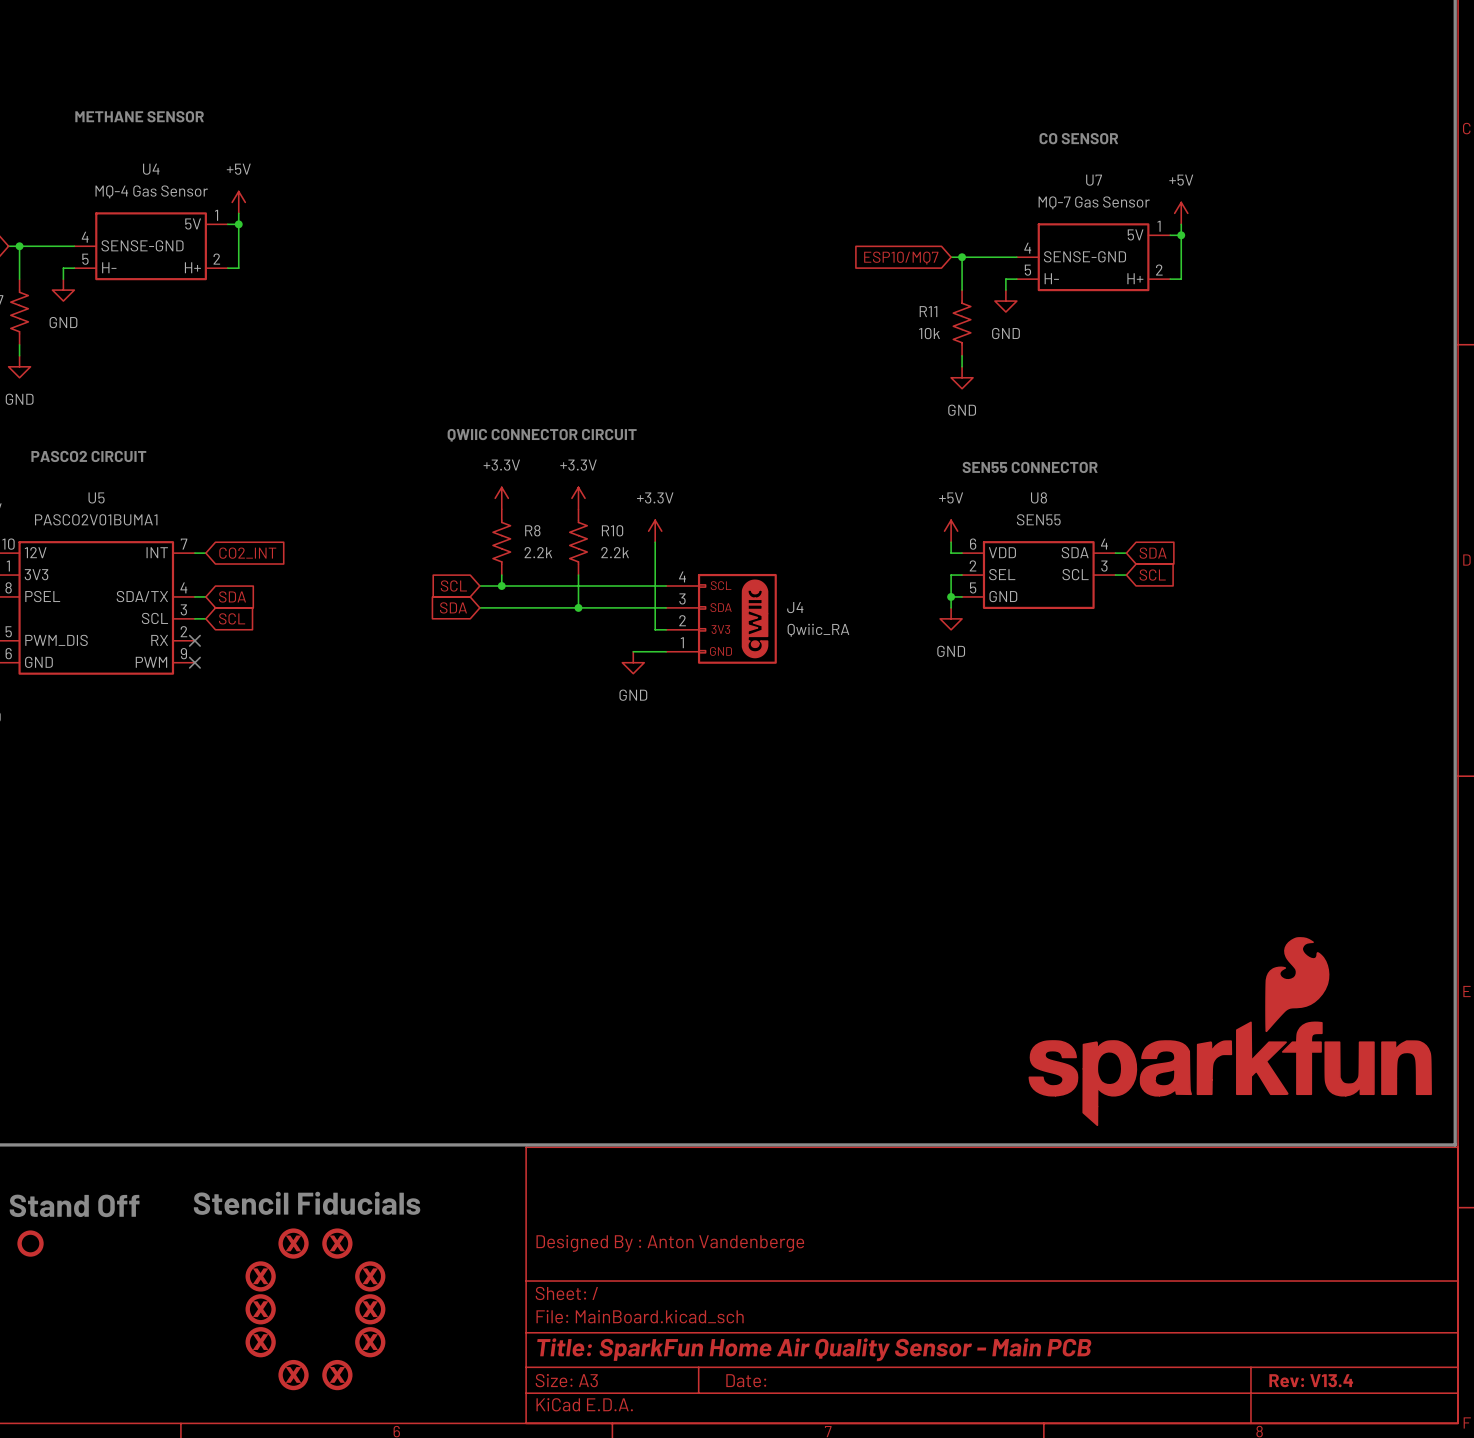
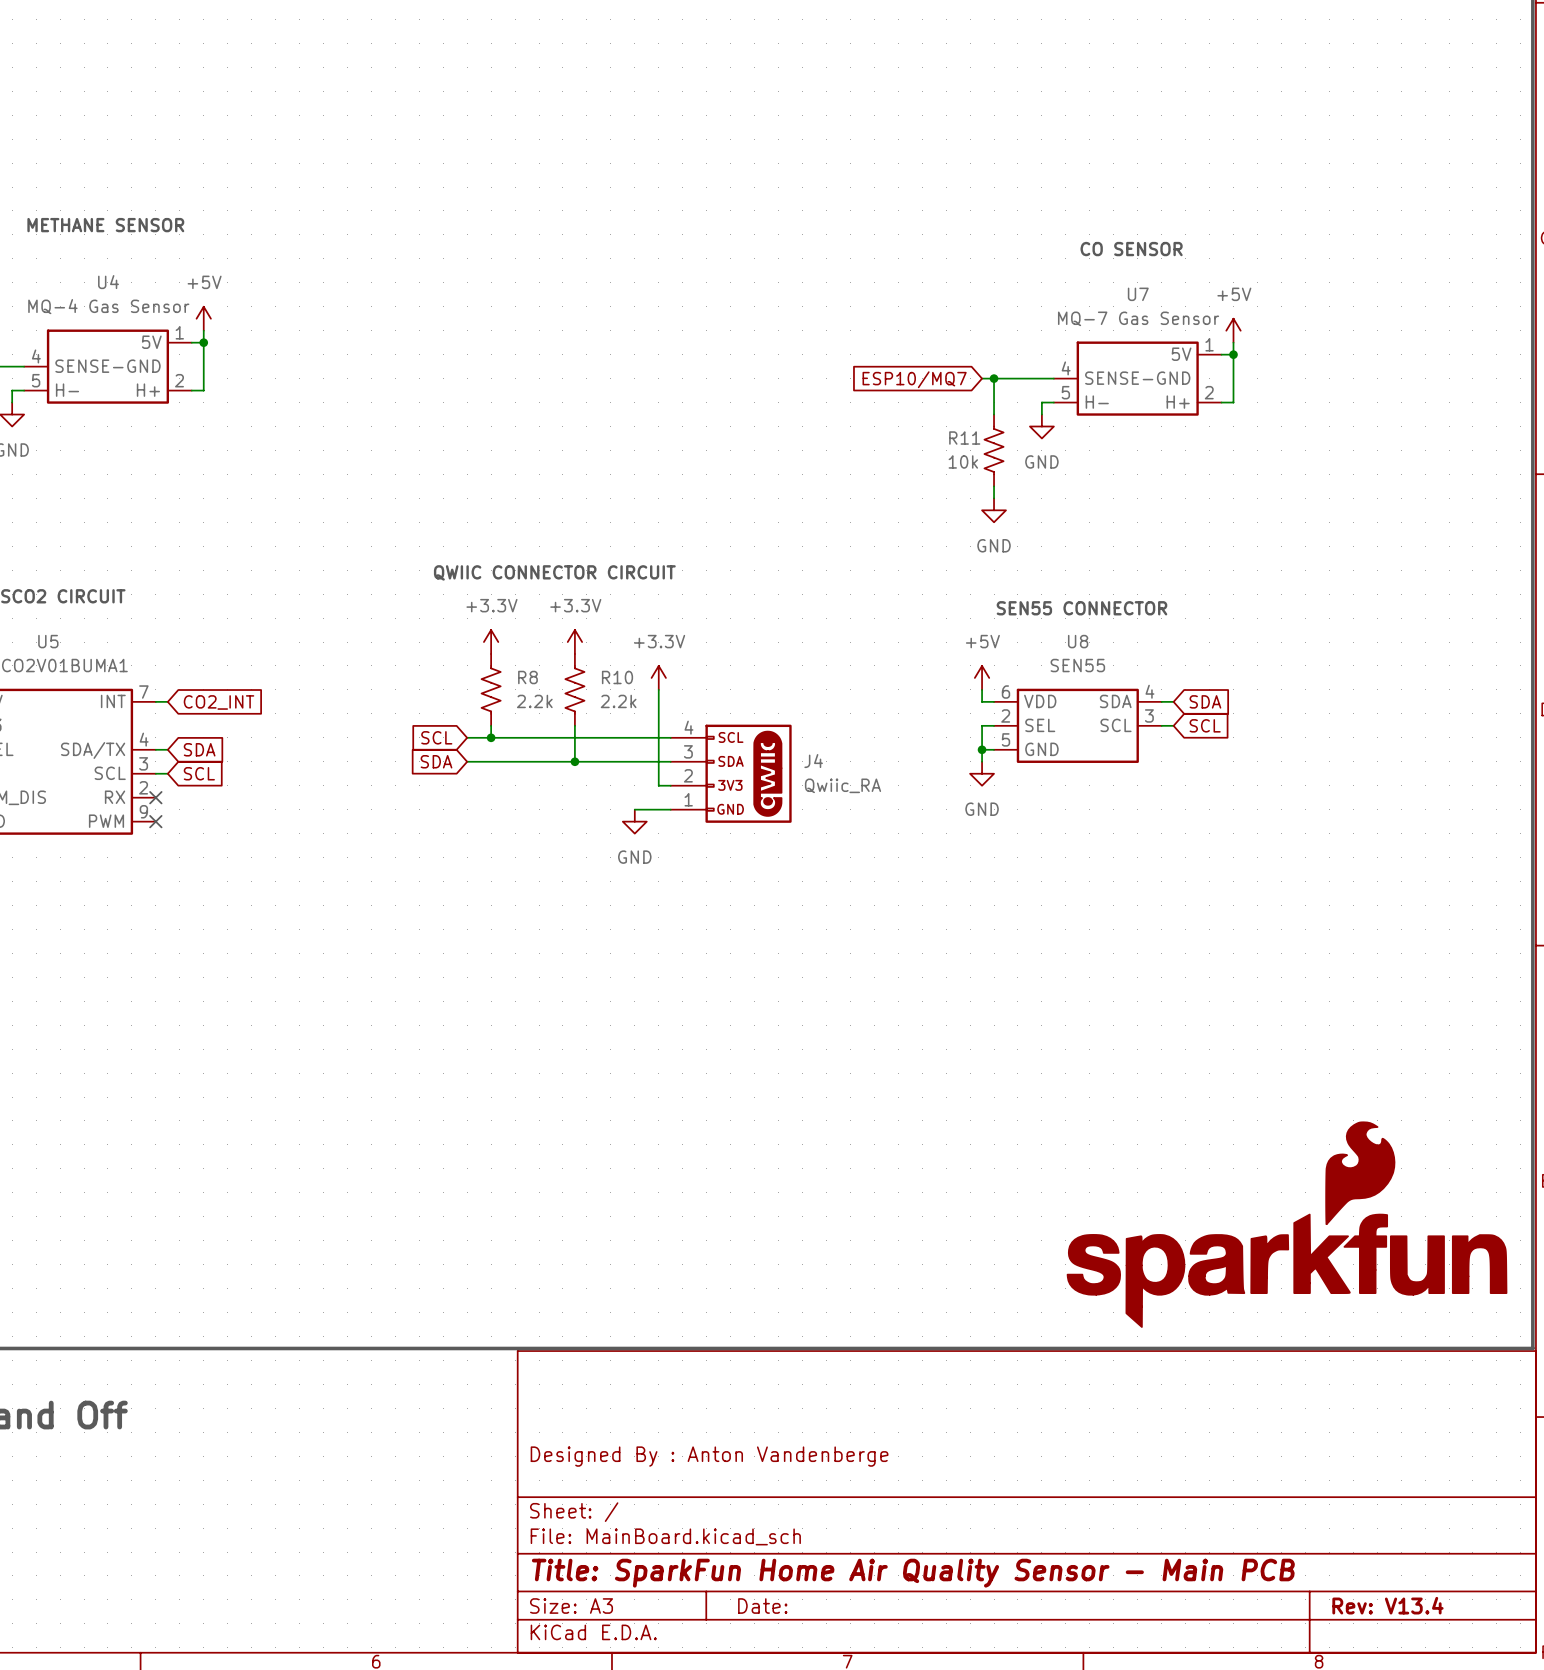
text: Stencil Fiducials (307, 1203) -> none
part: (293, 1243) -> none
part: (337, 1243) -> none
part: (260, 1276) -> none
part: (370, 1276) -> none
part: (260, 1309) -> none
part: (370, 1309) -> none
part: (260, 1342) -> none
part: (370, 1342) -> none
part: (293, 1375) -> none
part: (337, 1375) -> none

